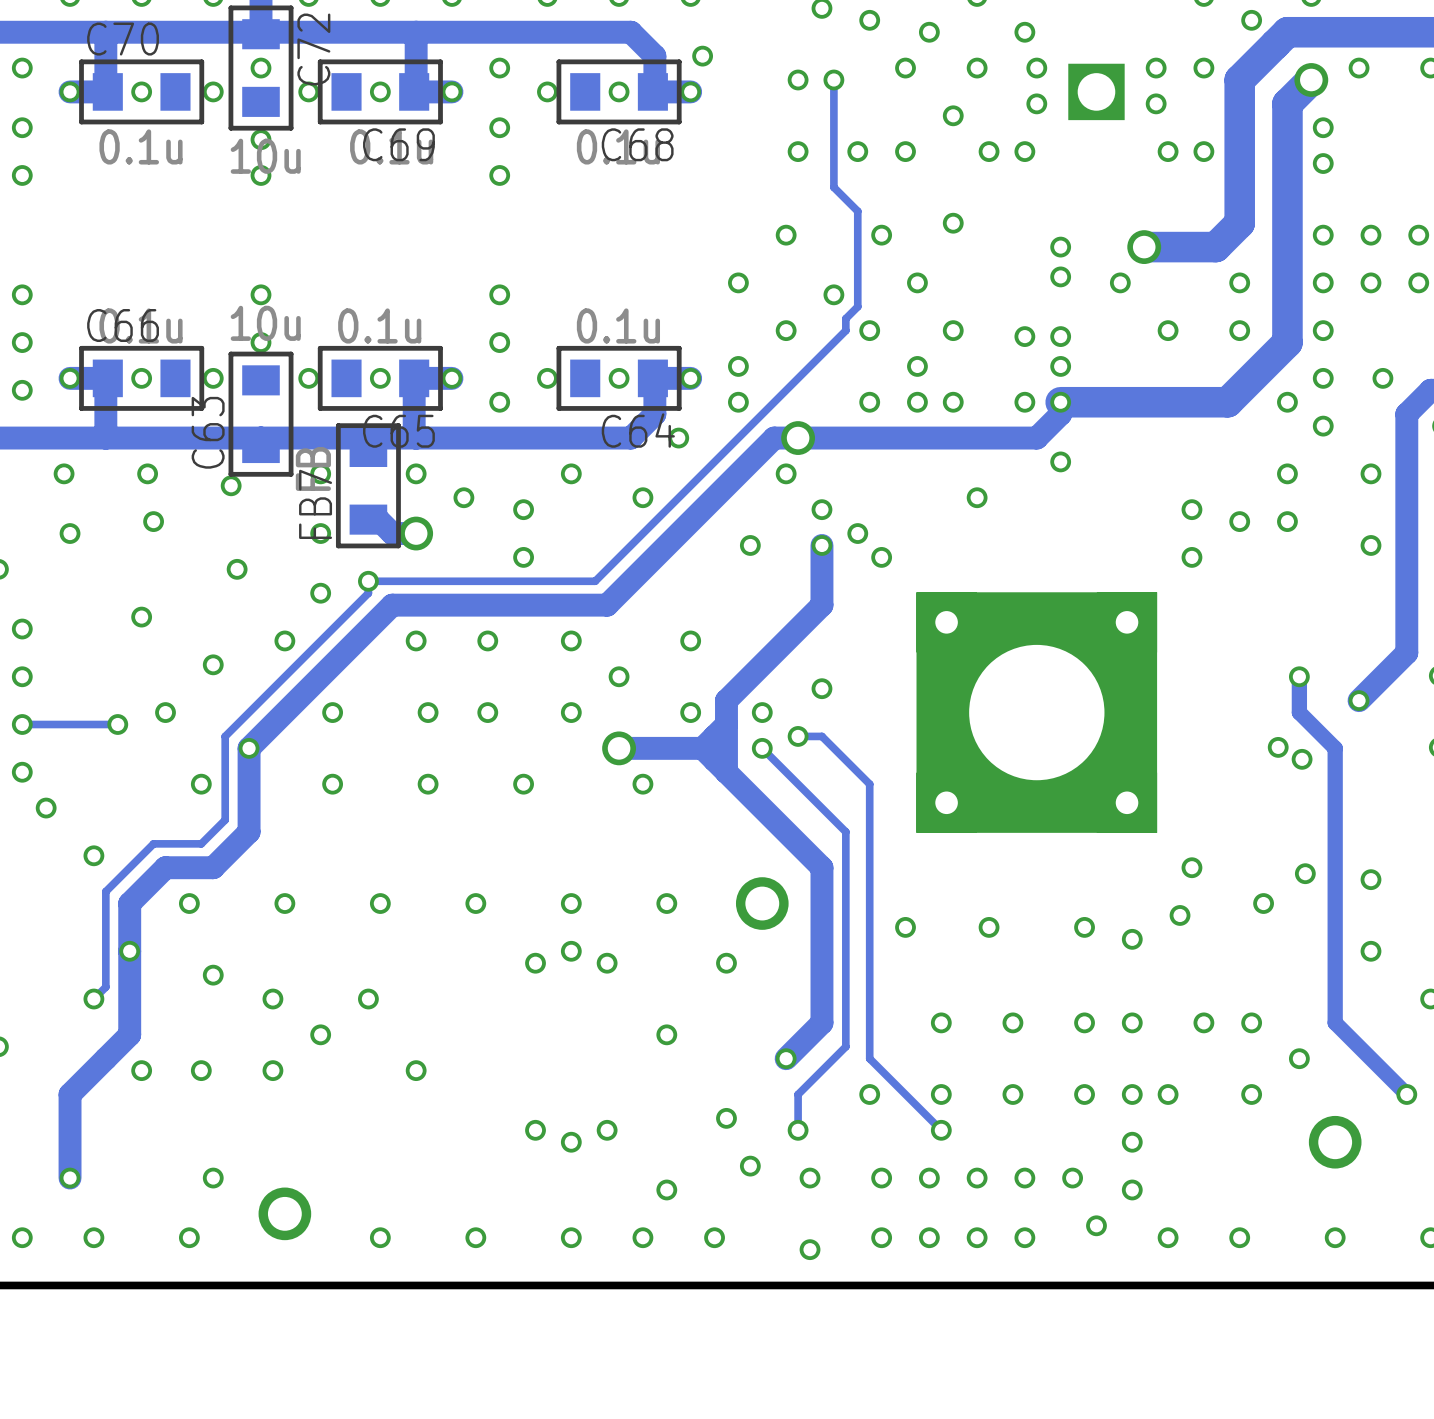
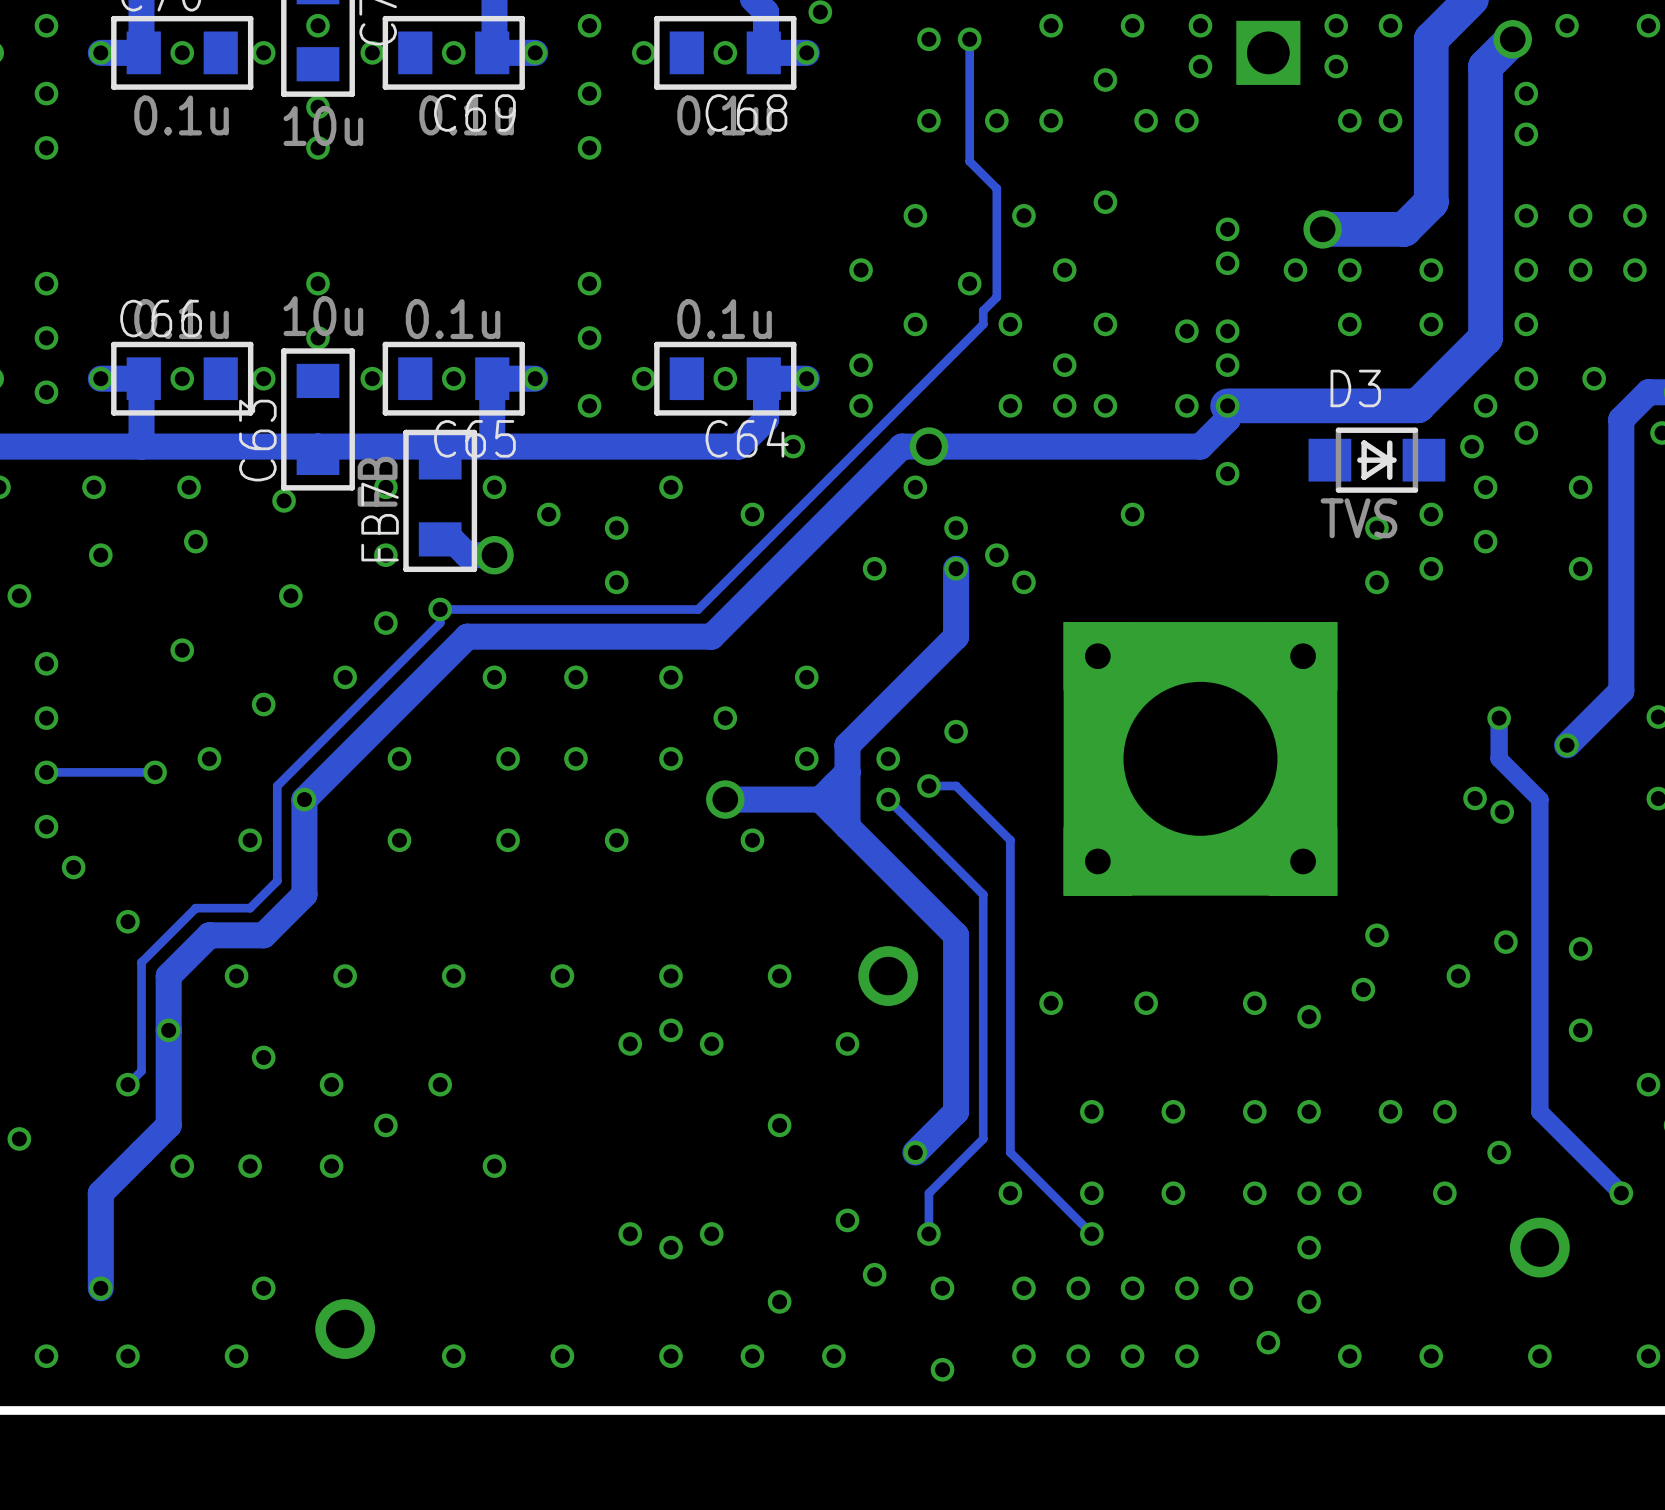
via: none -> (1349, 270)
via: none -> (1471, 446)
D3: none -> TVS (1376, 460)
via: none -> (1431, 514)
via: (1239, 521) -> none
via: none -> (1431, 568)

